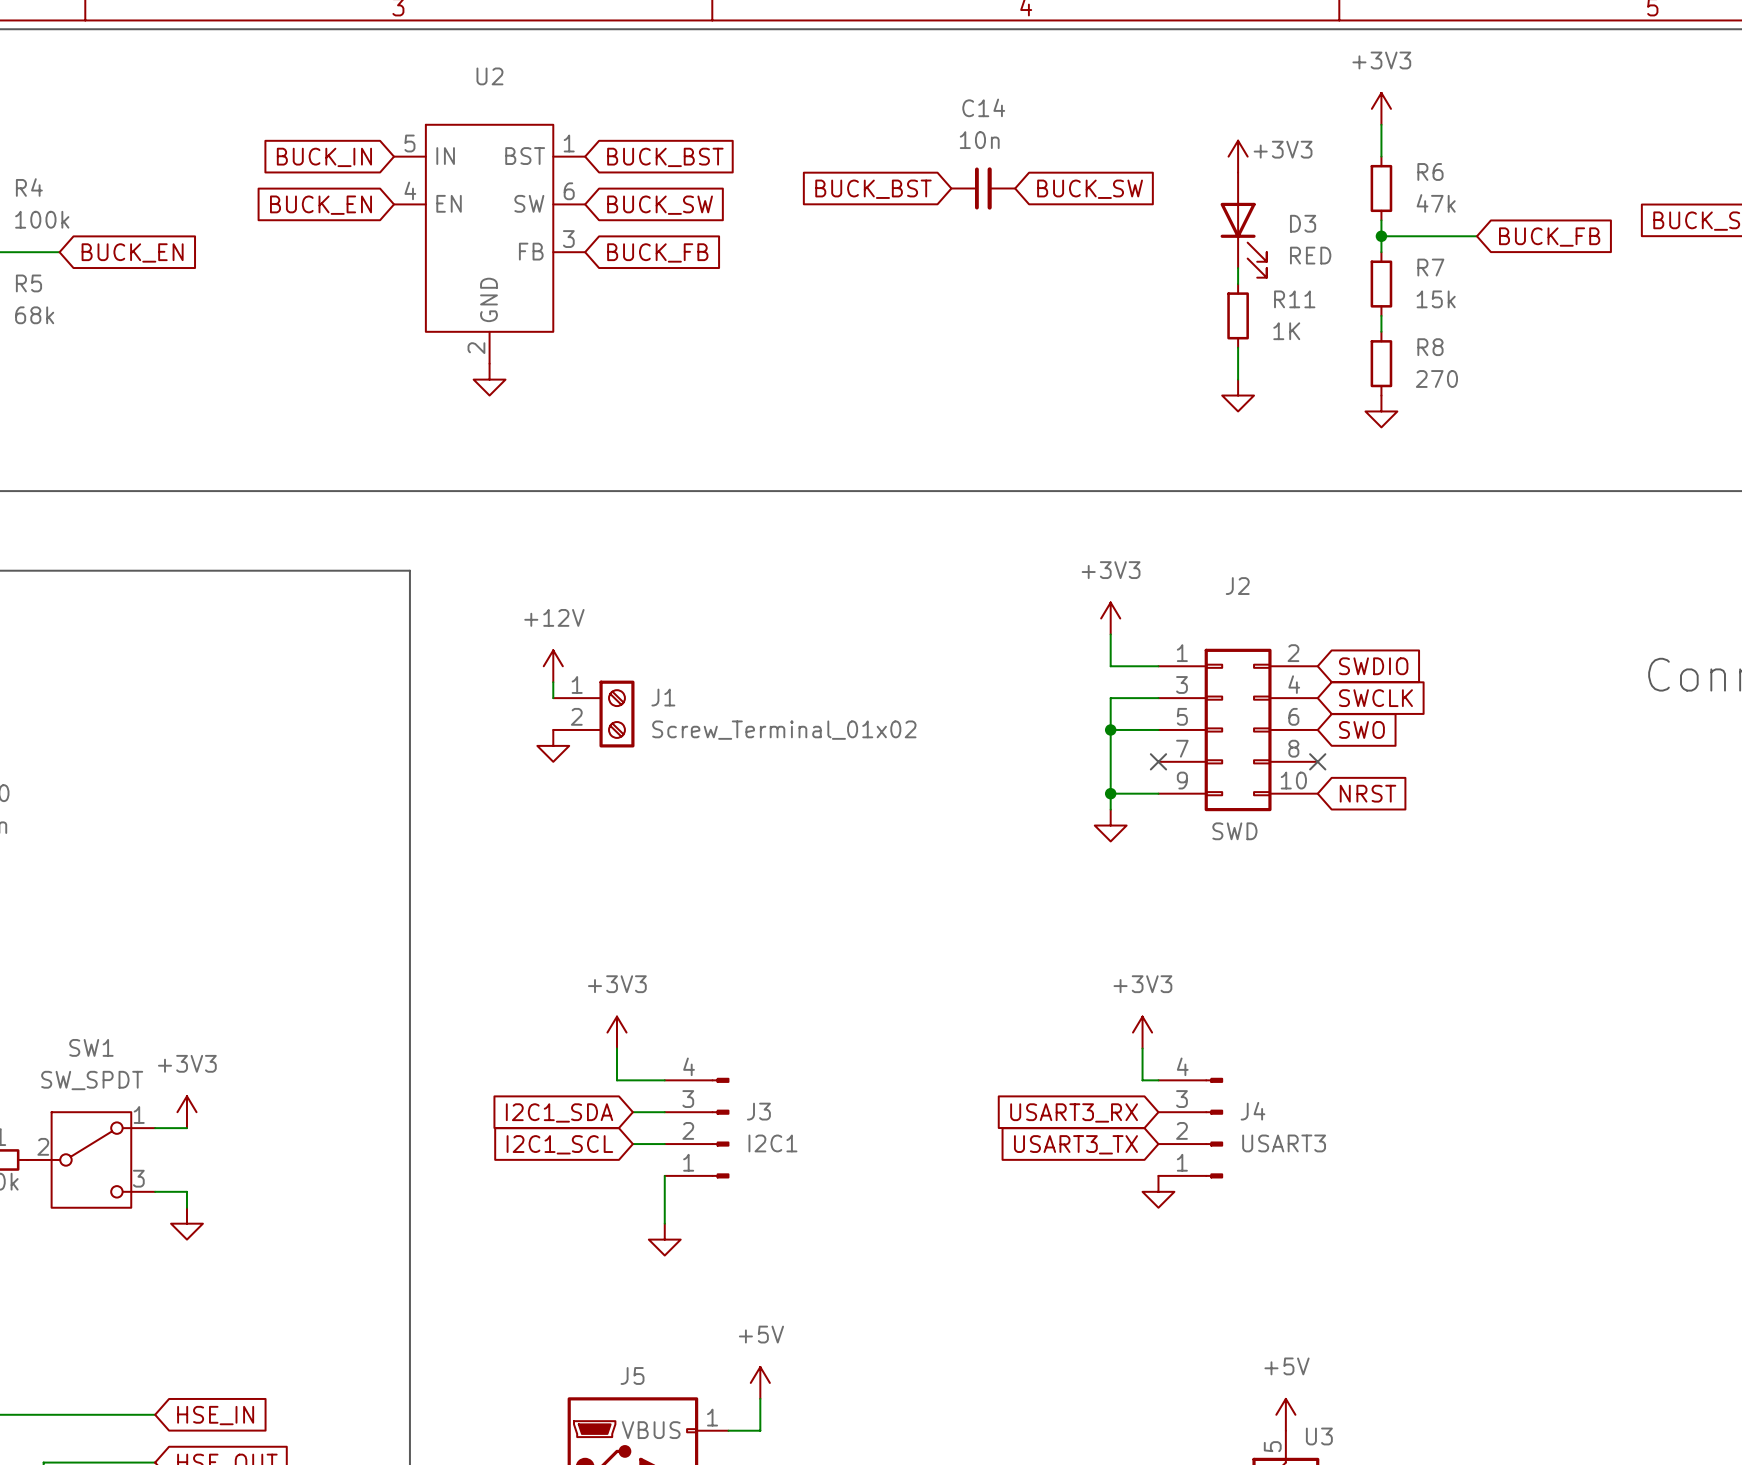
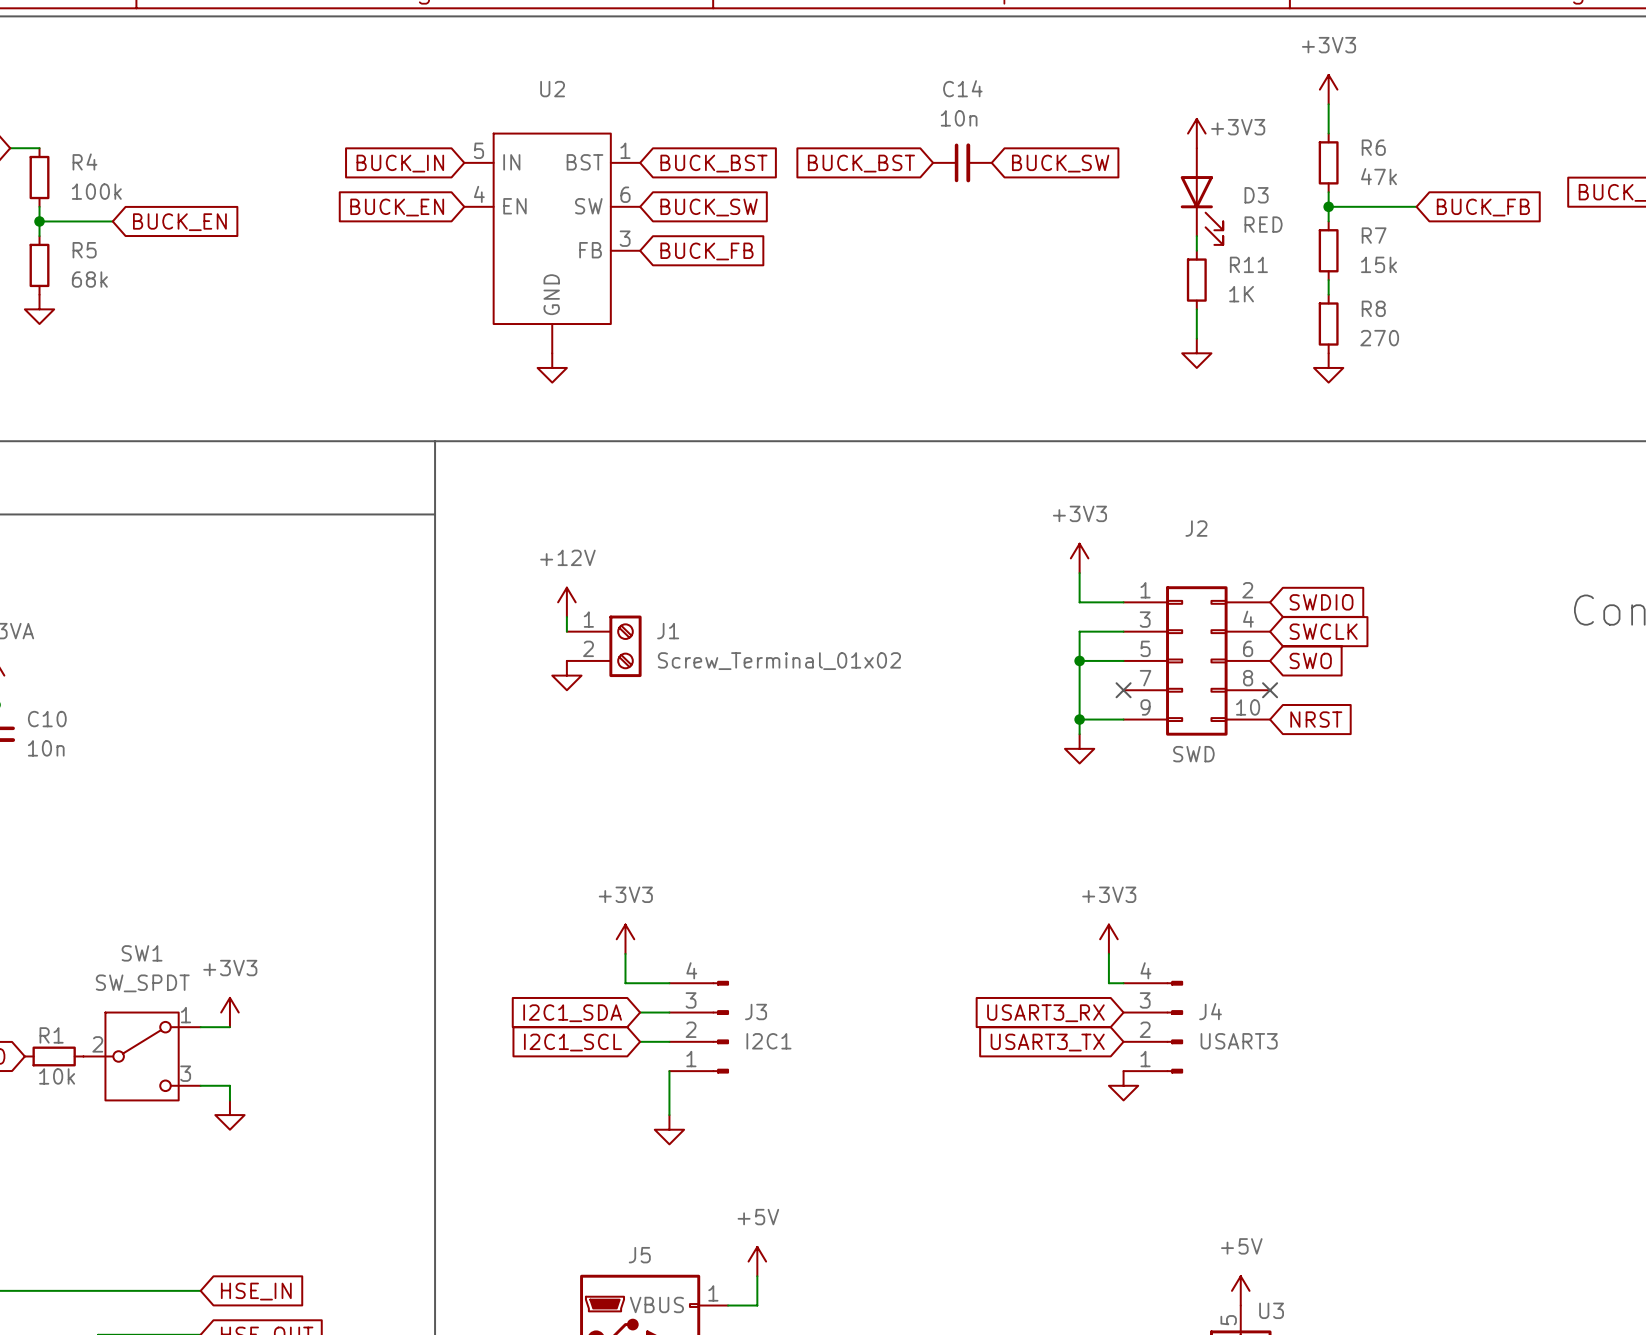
global label position: BUCK_IN (324, 157) -> BUCK_IN (400, 163)
global label position: BUCK_BST (665, 157) -> BUCK_BST (713, 163)
global label position: BUCK_EN (321, 205) -> BUCK_EN (397, 207)
global label position: BUCK_SW (660, 205) -> BUCK_SW (709, 207)
U2 position: (489, 244) -> (552, 243)
global label position: BUCK_FB (657, 252) -> BUCK_FB (706, 251)
U2 pin number: 2 (476, 348) -> none
power symbol position: (489, 379) -> (552, 367)
line: none -> (435, 441) (435, 514)

